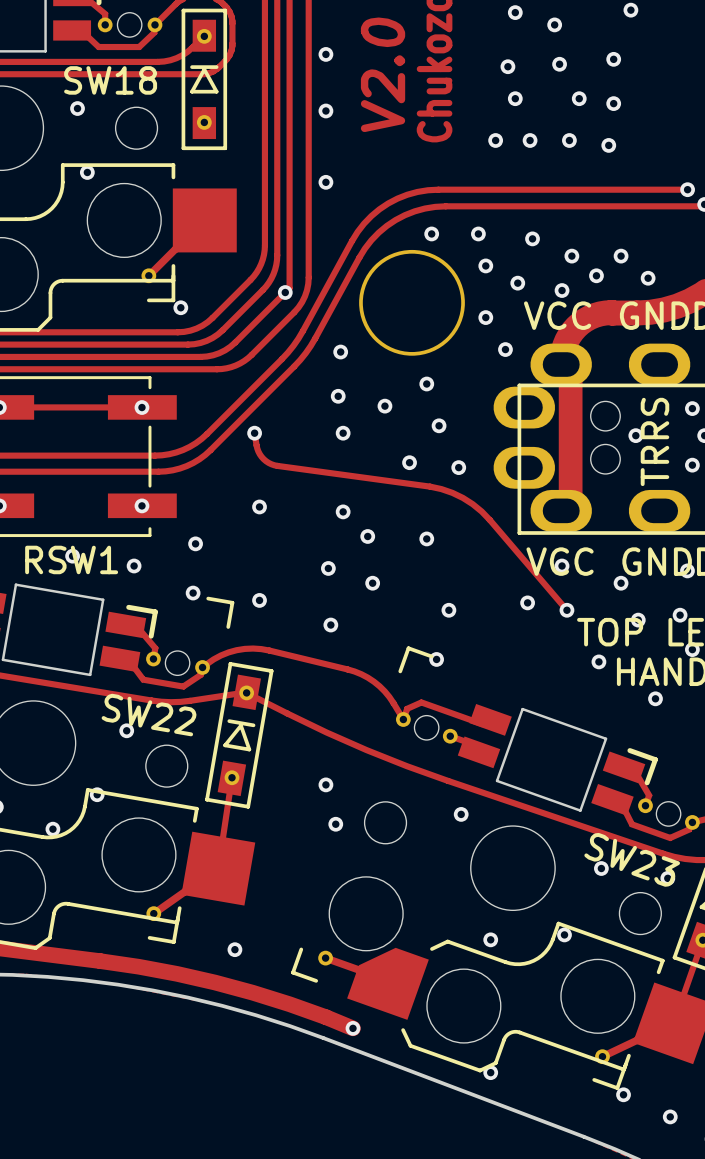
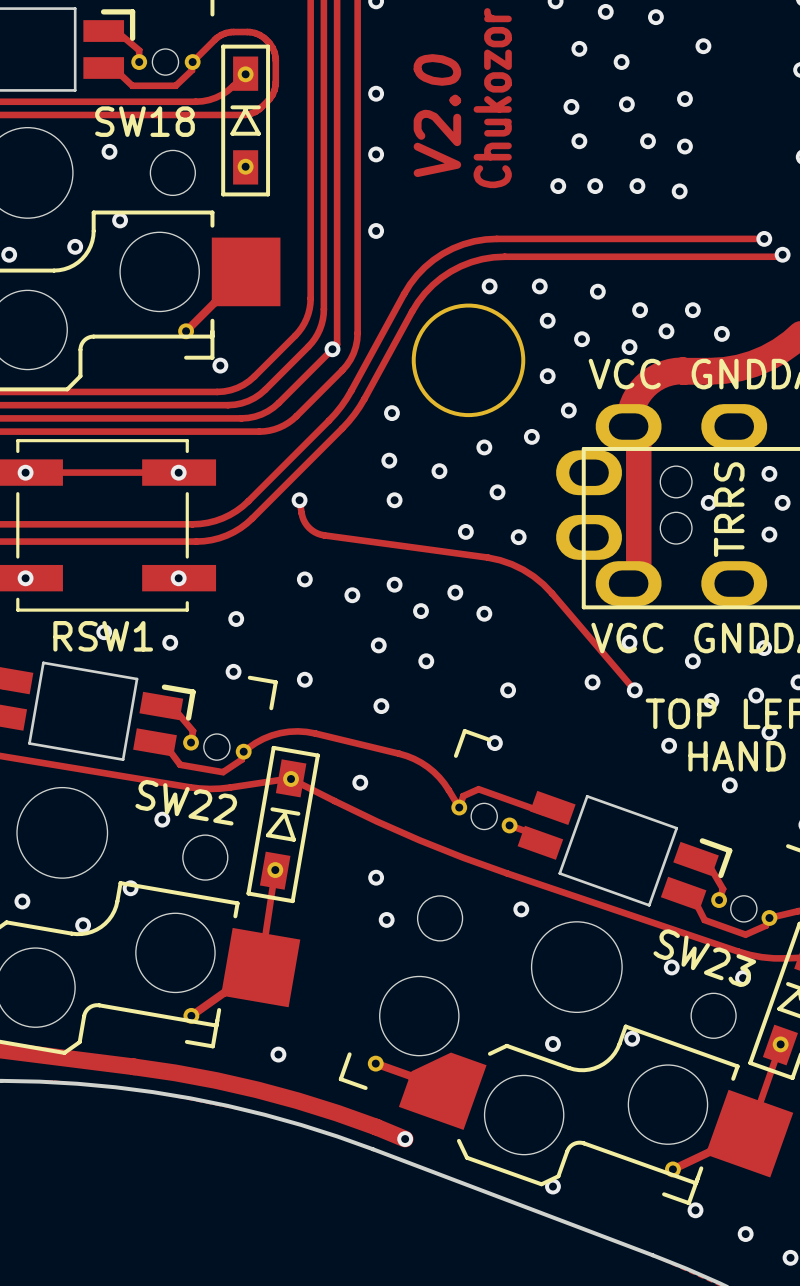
via: none -> (75, 246)
via: none -> (531, 436)
via: none -> (455, 592)
via: none -> (352, 595)
via: none -> (360, 782)

